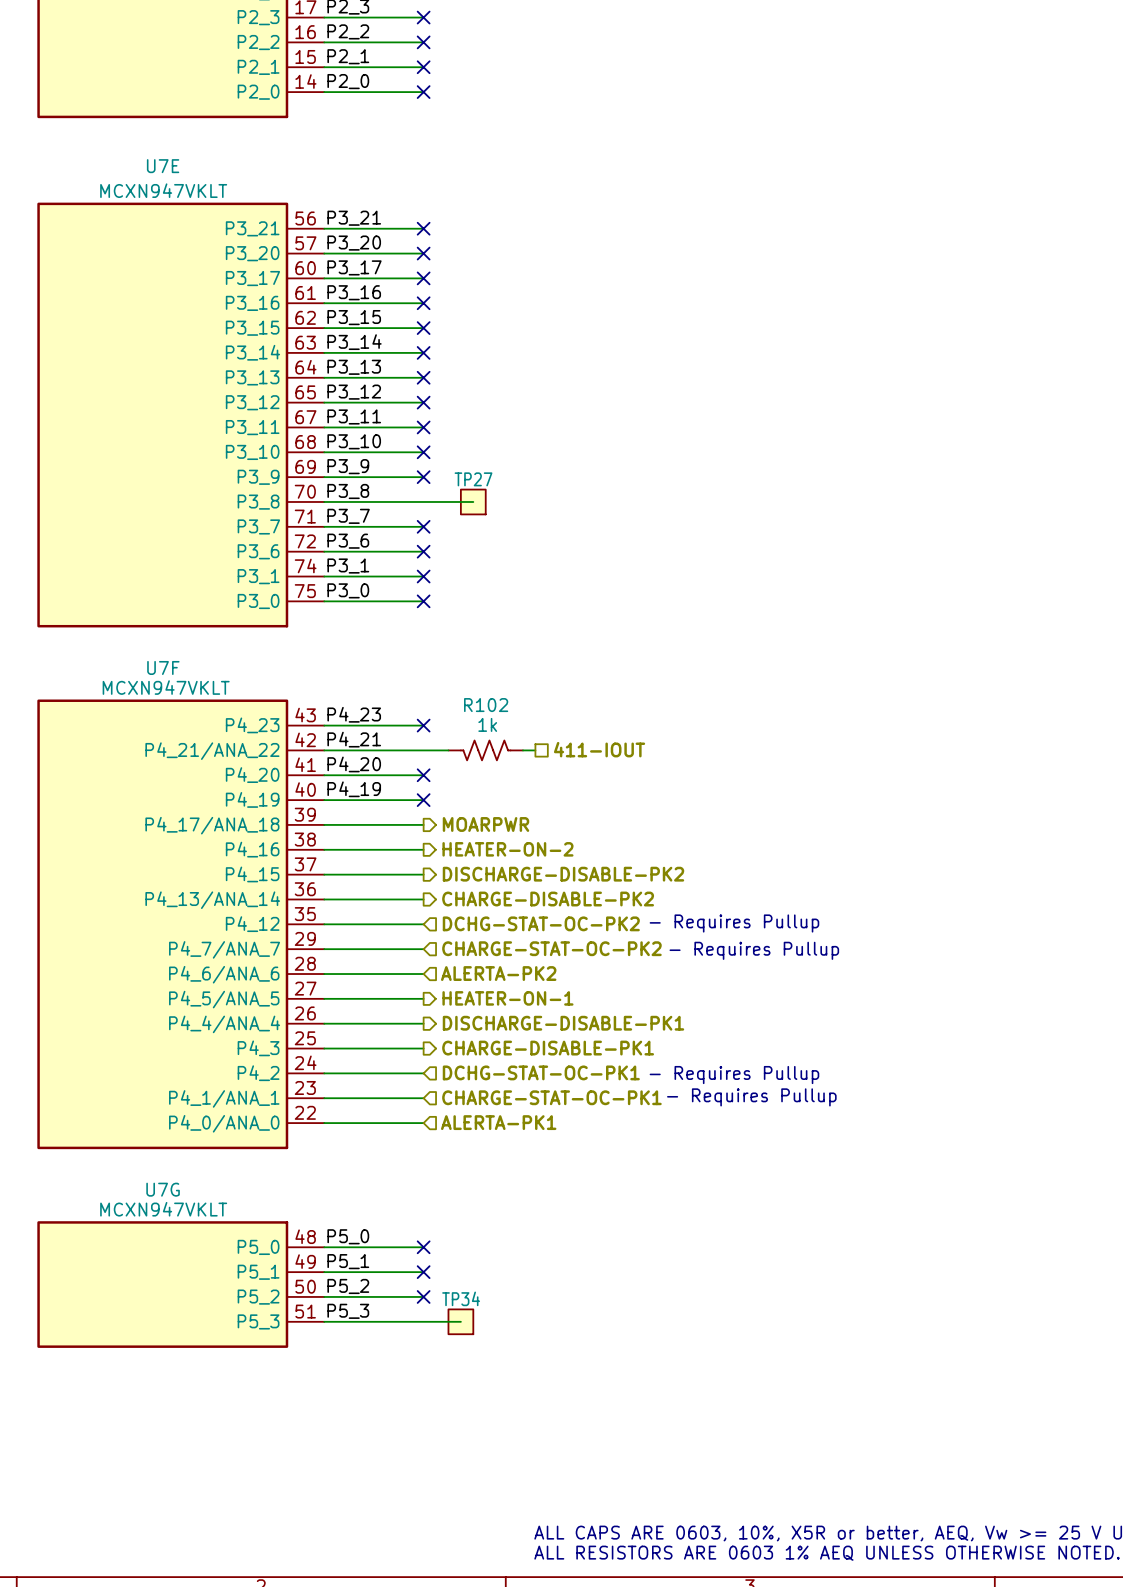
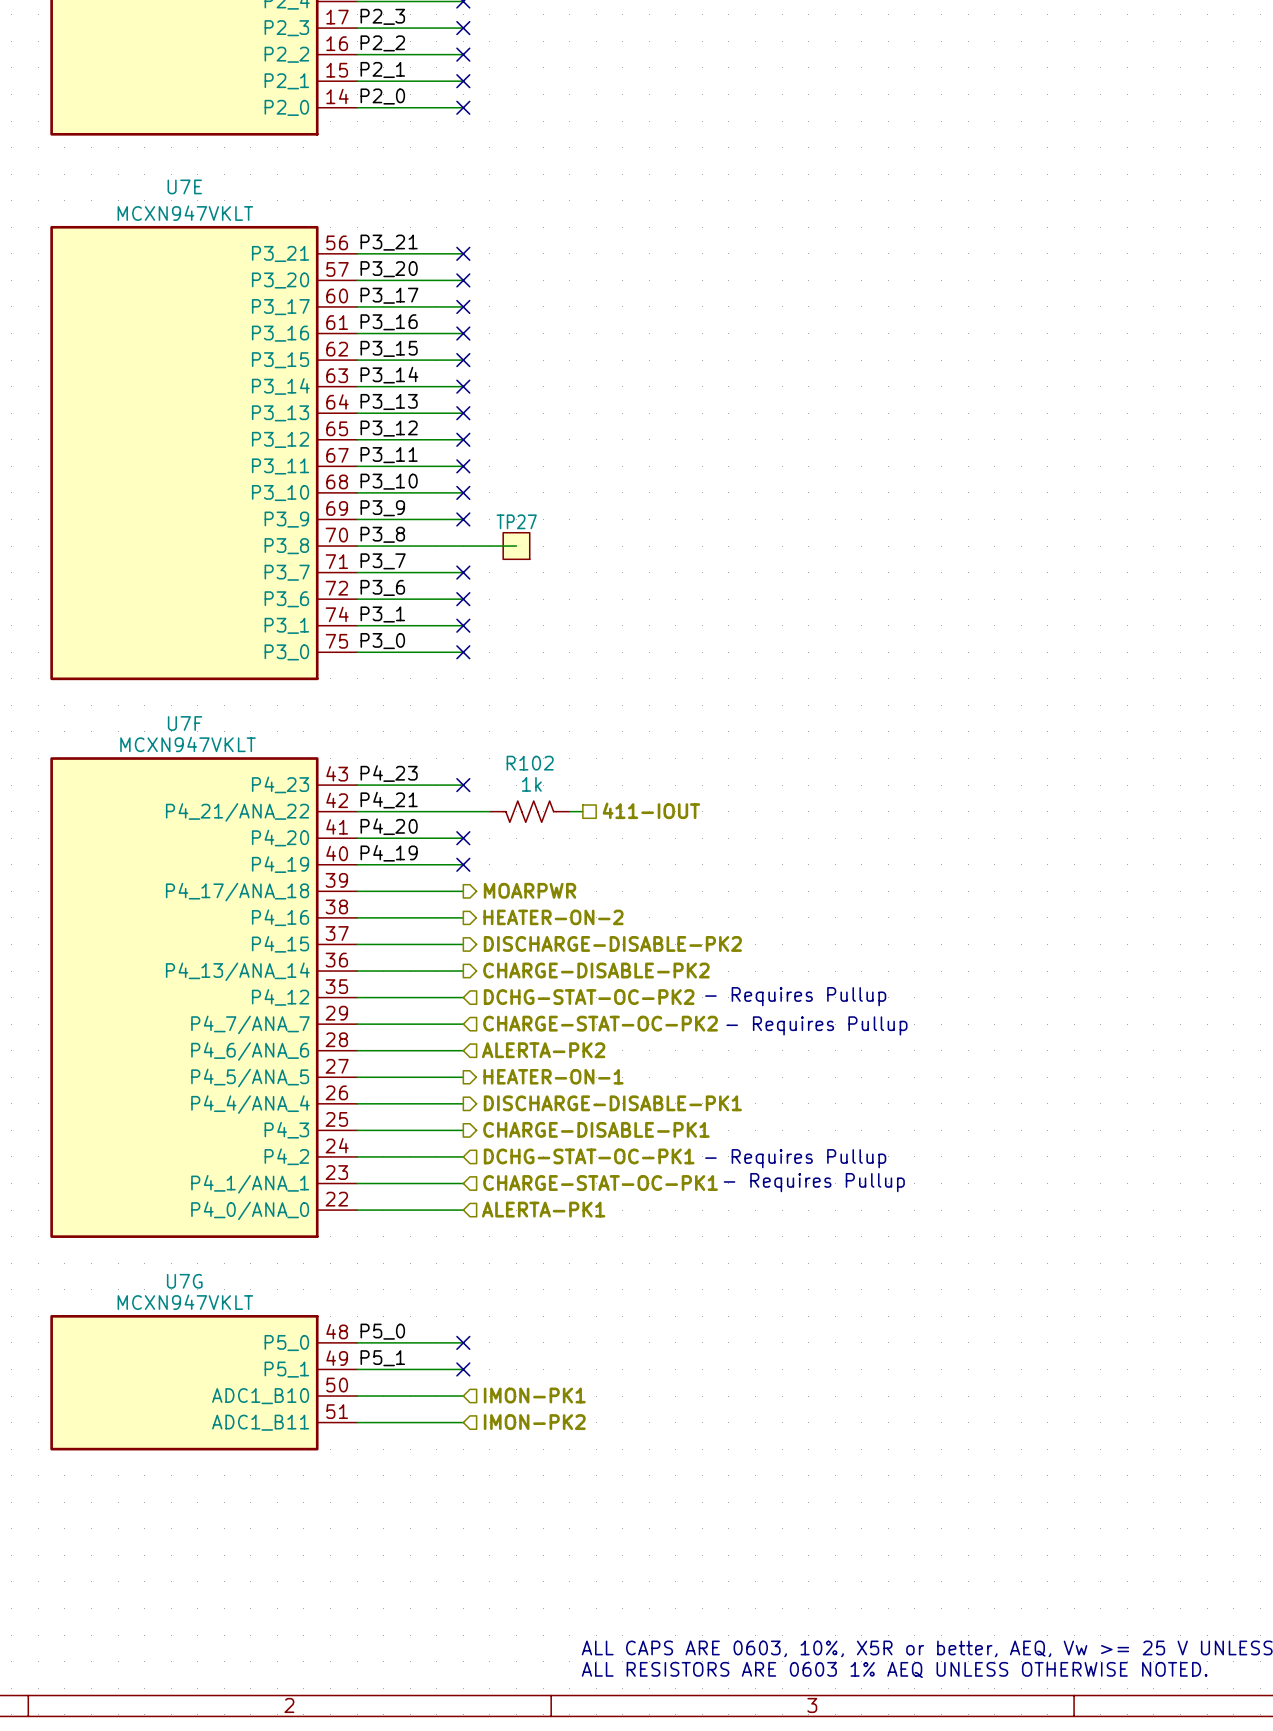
label: P5_2 (348, 1286) -> none
no-connect mark: (423, 1296) -> none
hierarchical label: none -> IMON-PK1 (534, 1395)
U7G pin name: P5_2 (258, 1297) -> ADC1_B10 (260, 1396)
label: P5_3 (348, 1311) -> none
U7G pin name: P5_3 (258, 1321) -> ADC1_B11 (260, 1422)
wire: (423, 1321) (460, 1321) -> none
TP34: (460, 1321) -> none
hierarchical label: none -> IMON-PK2 (534, 1422)

